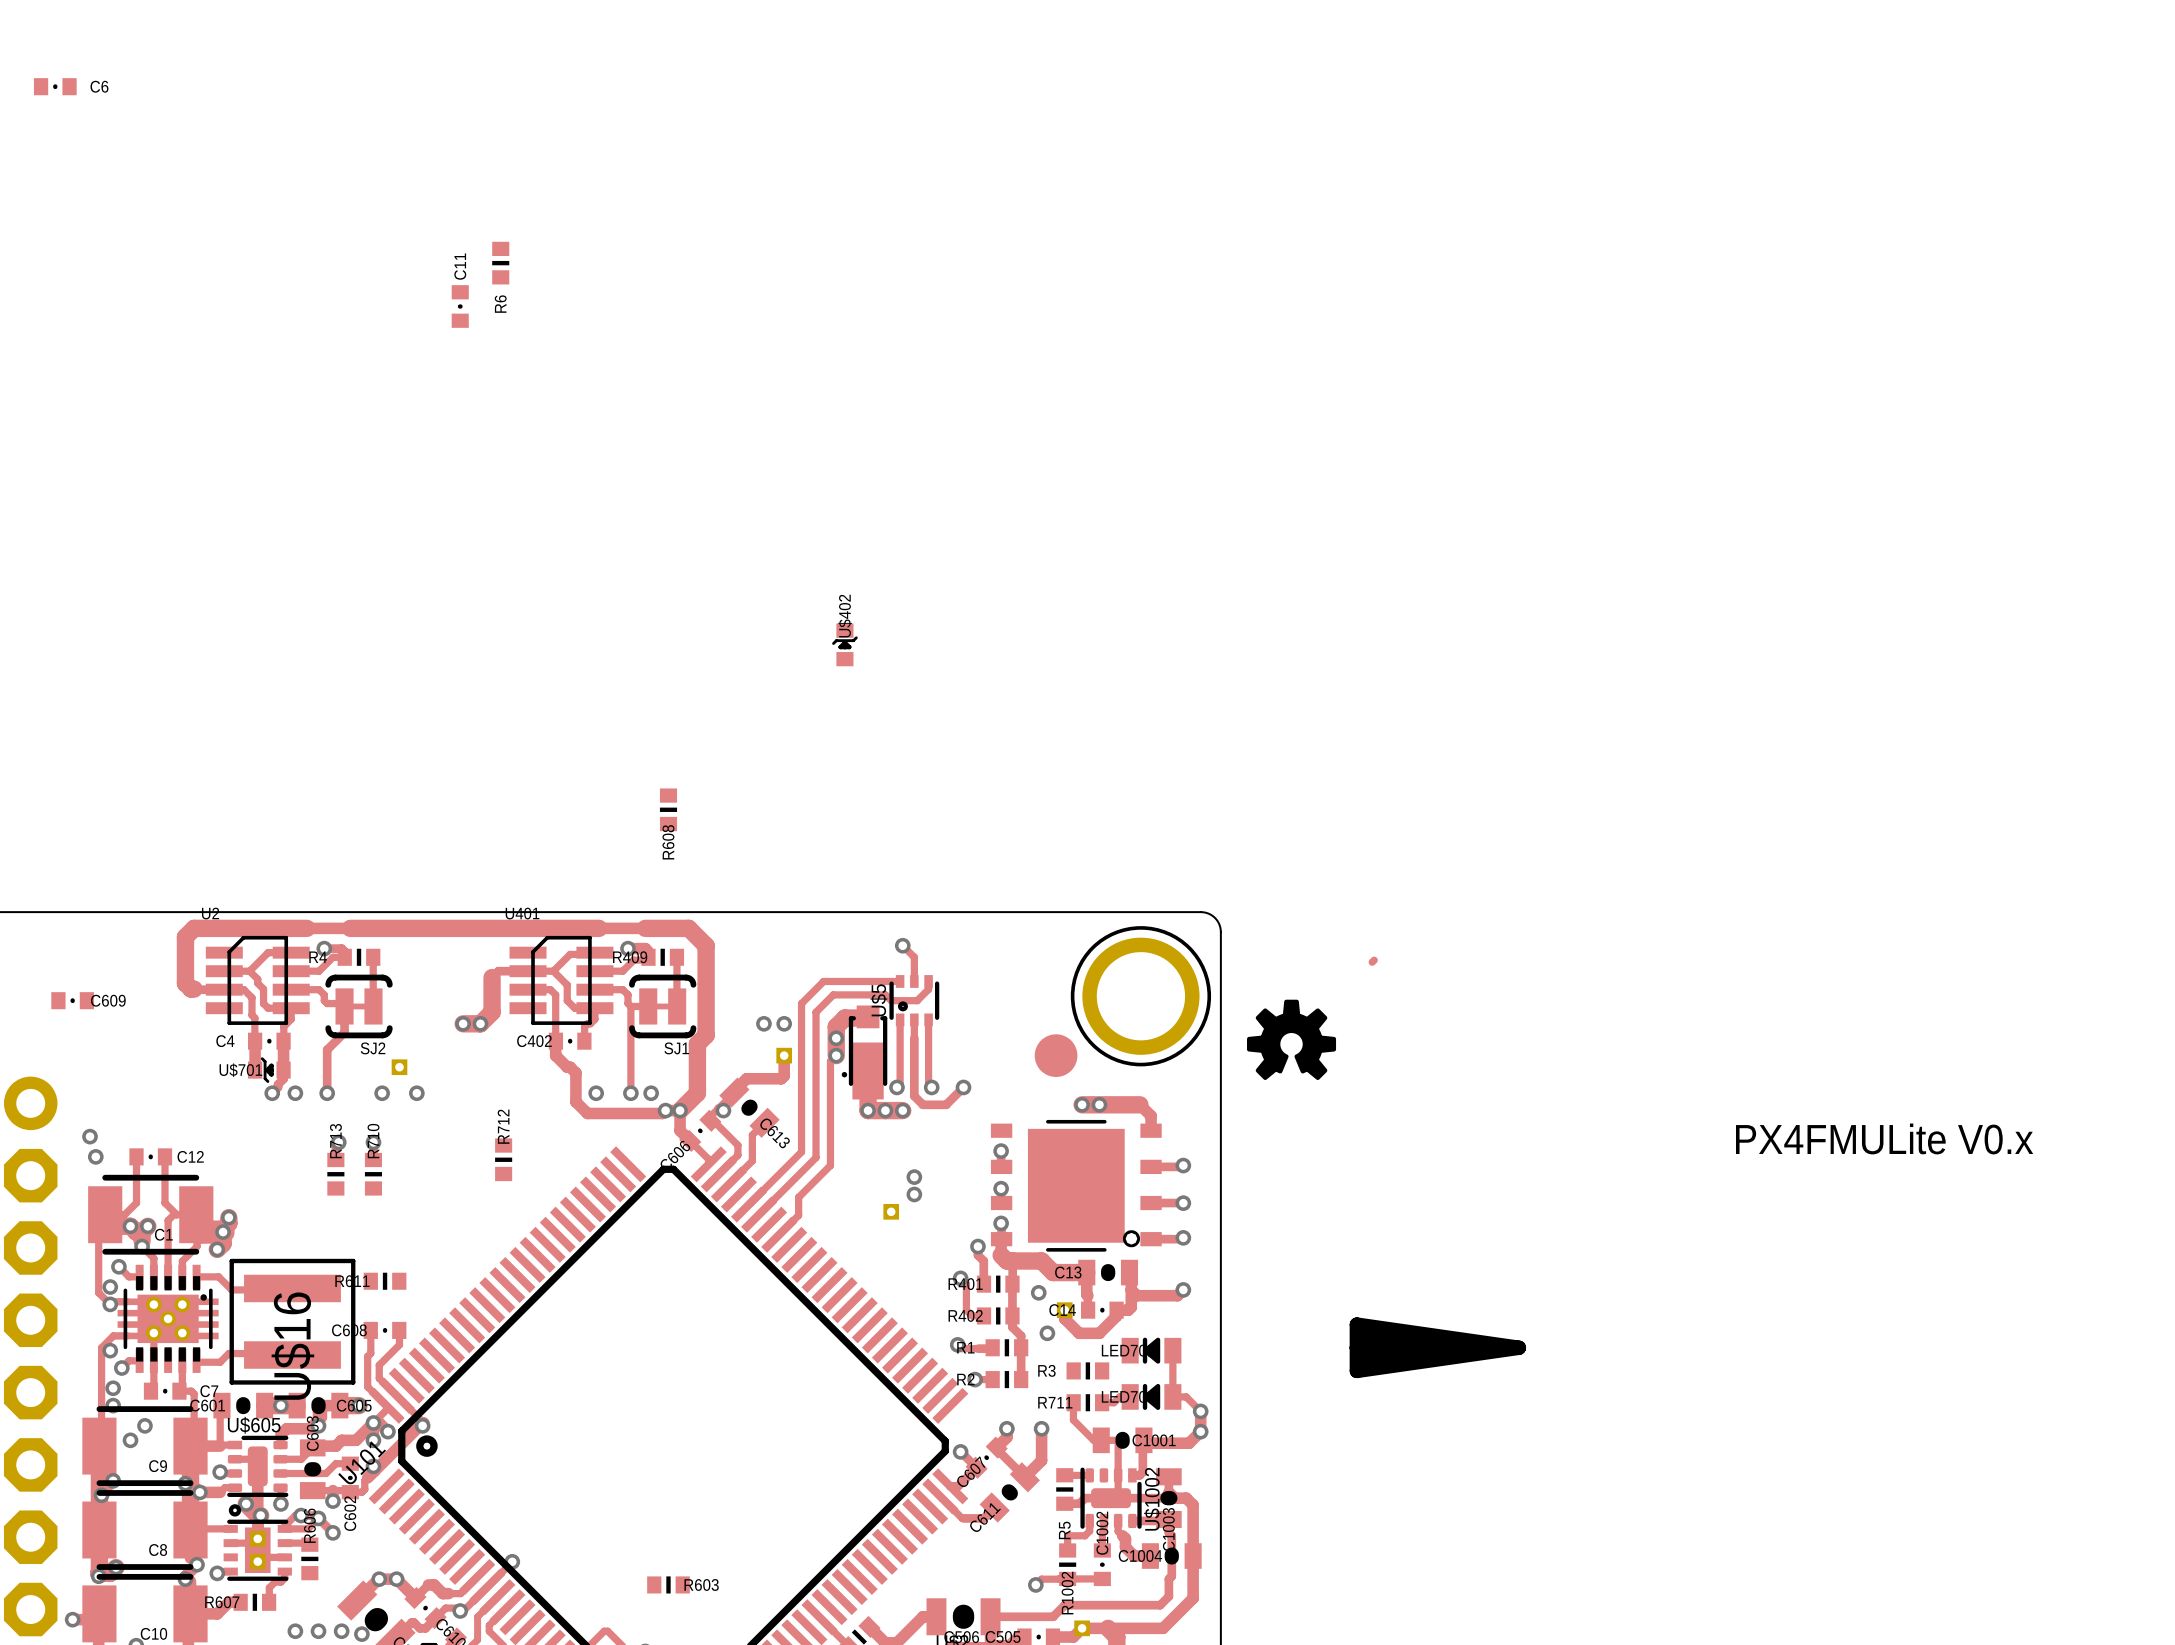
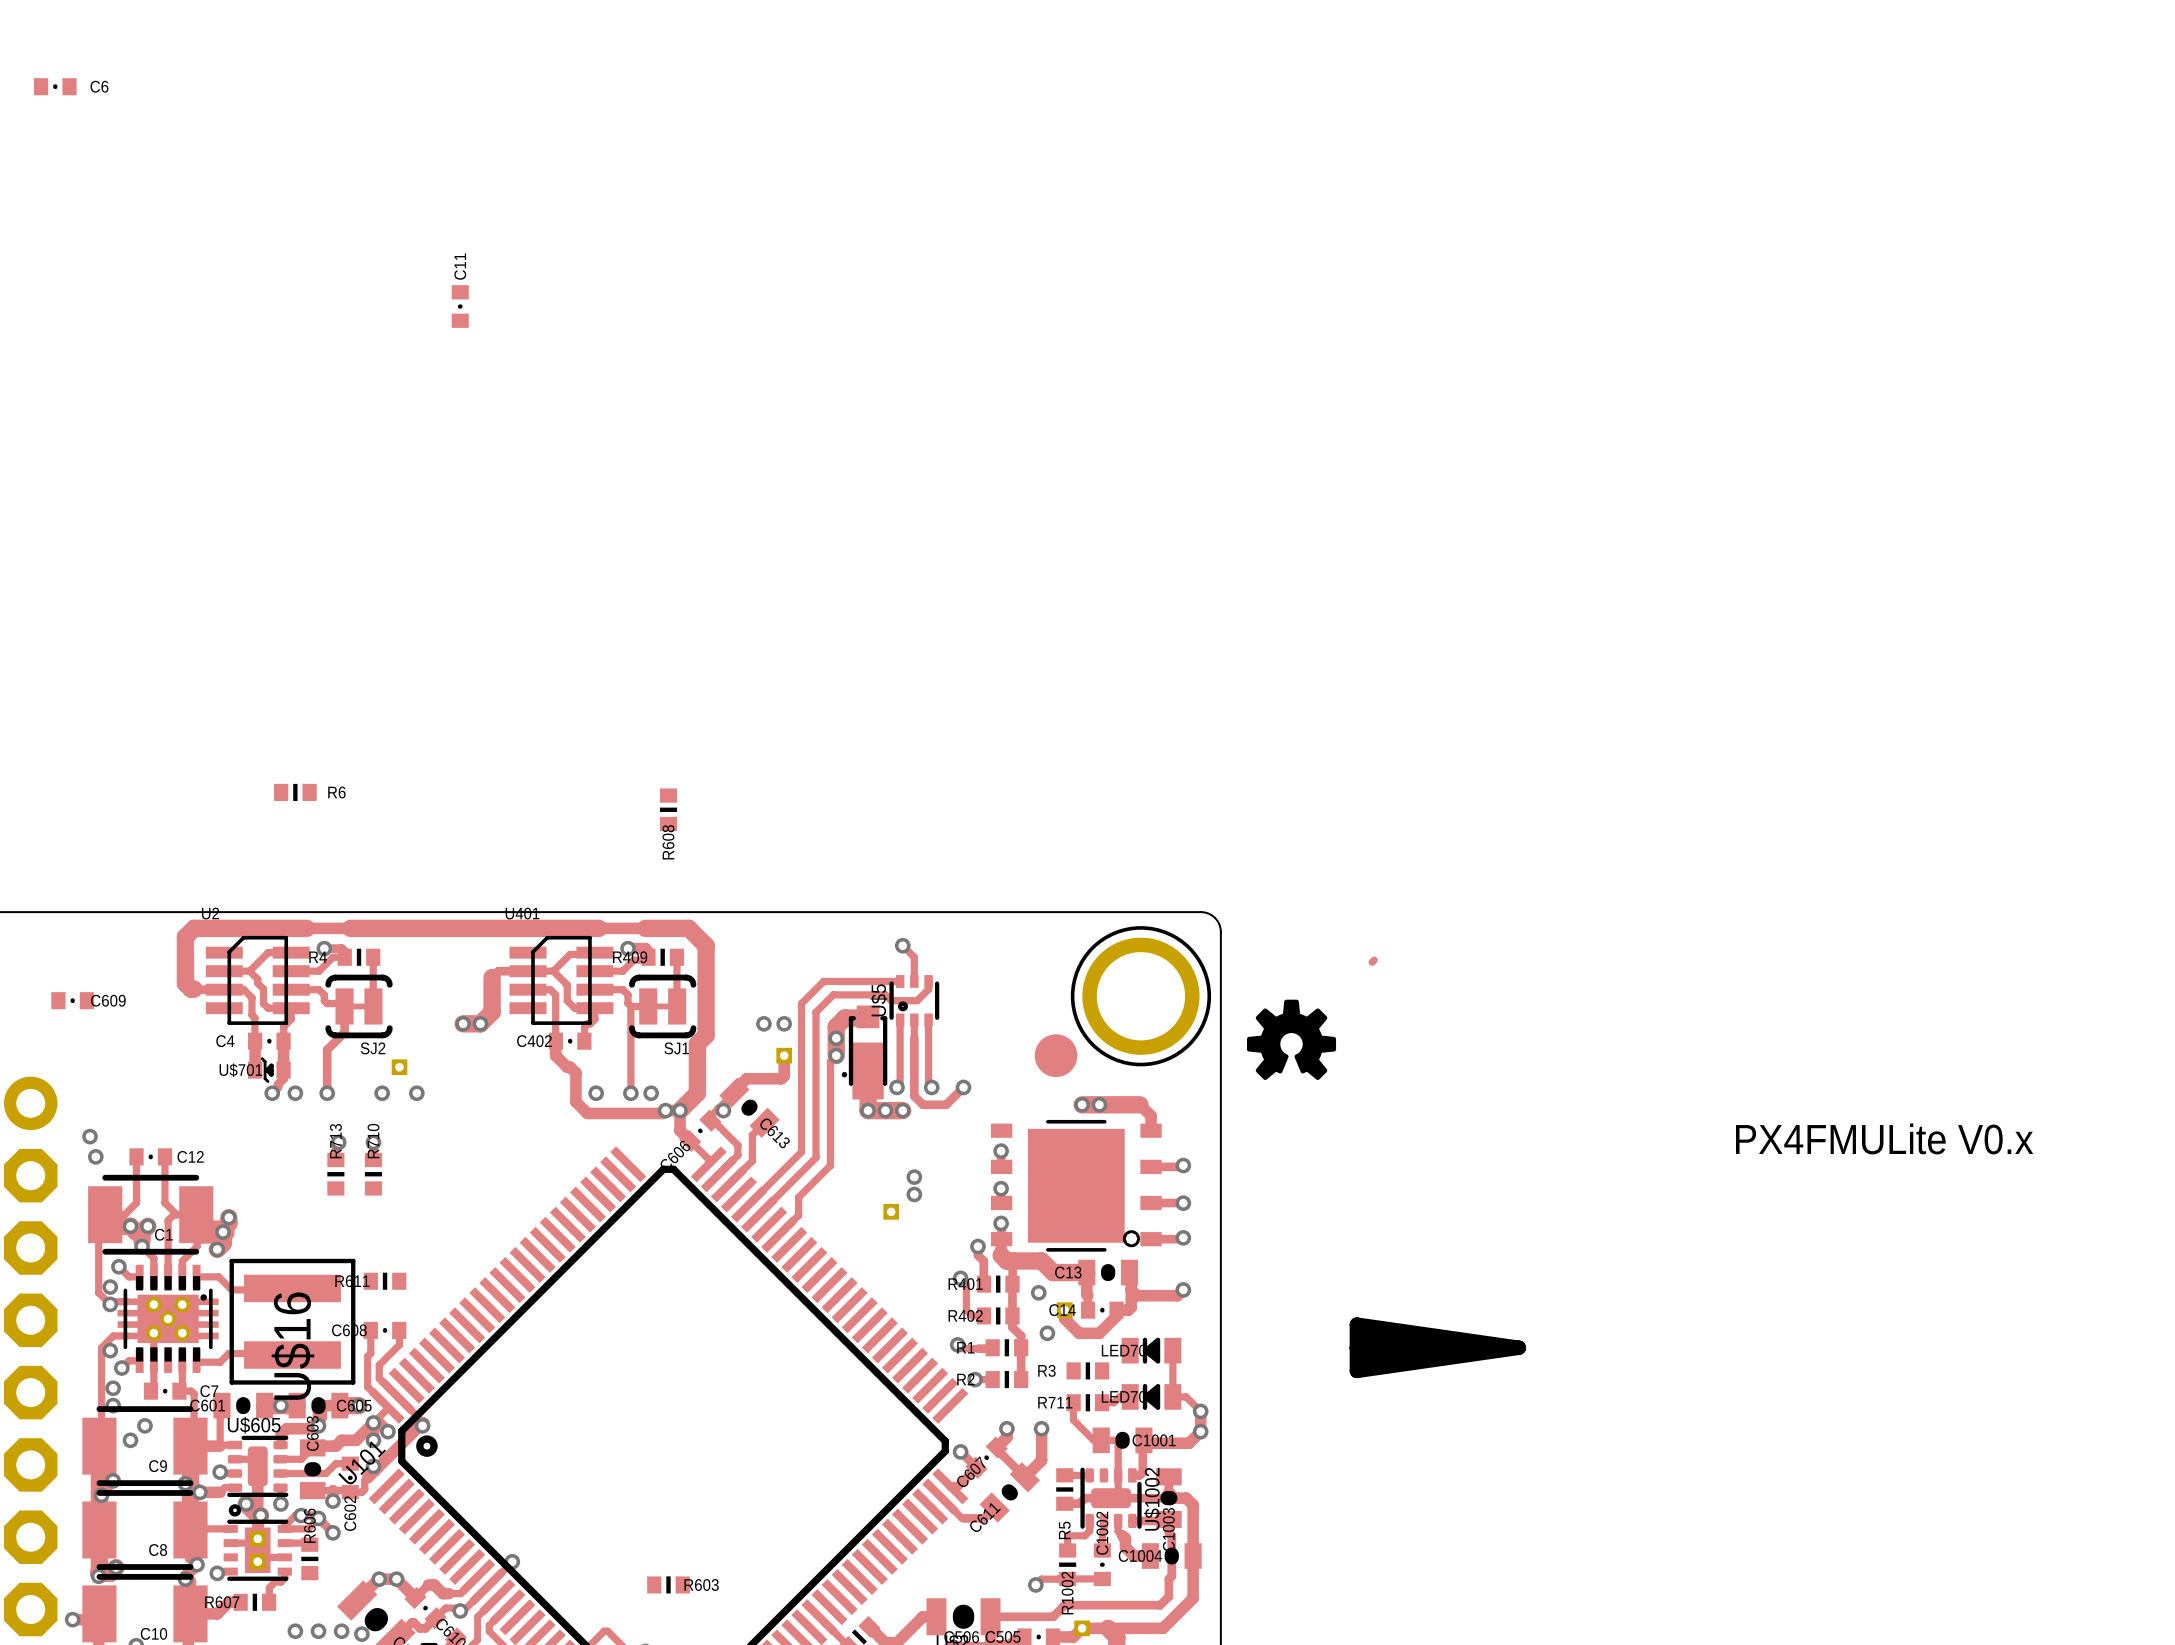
R6 rotation: 0° (500, 263) -> 90° clockwise (295, 792)
R6 position: (500, 263) -> (295, 792)
U$402: (844, 644) -> none
R712: (503, 1159) -> none

